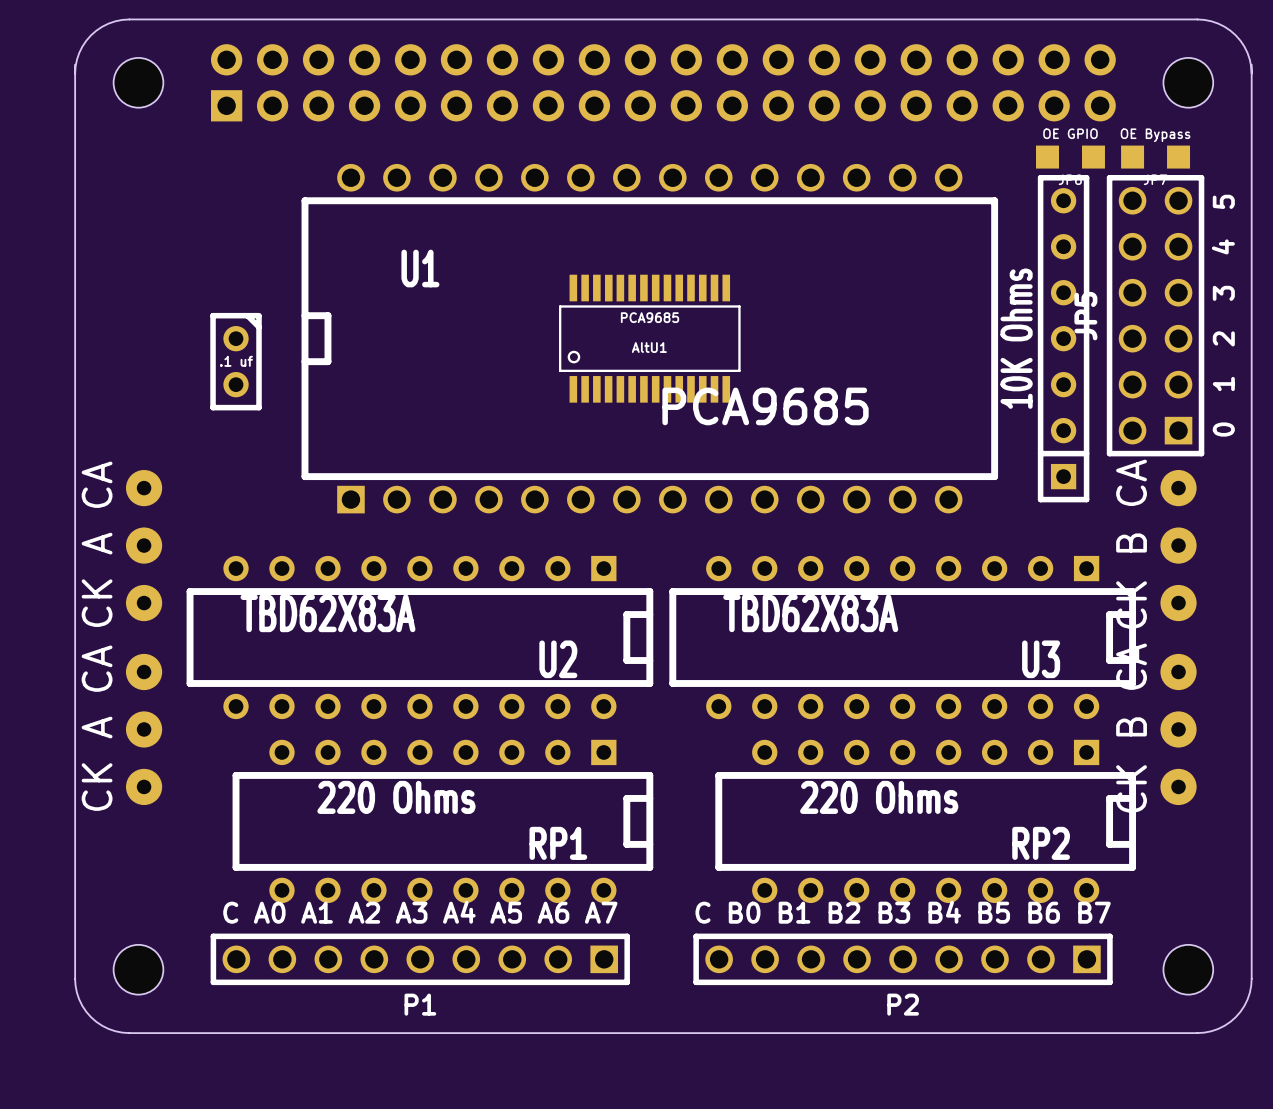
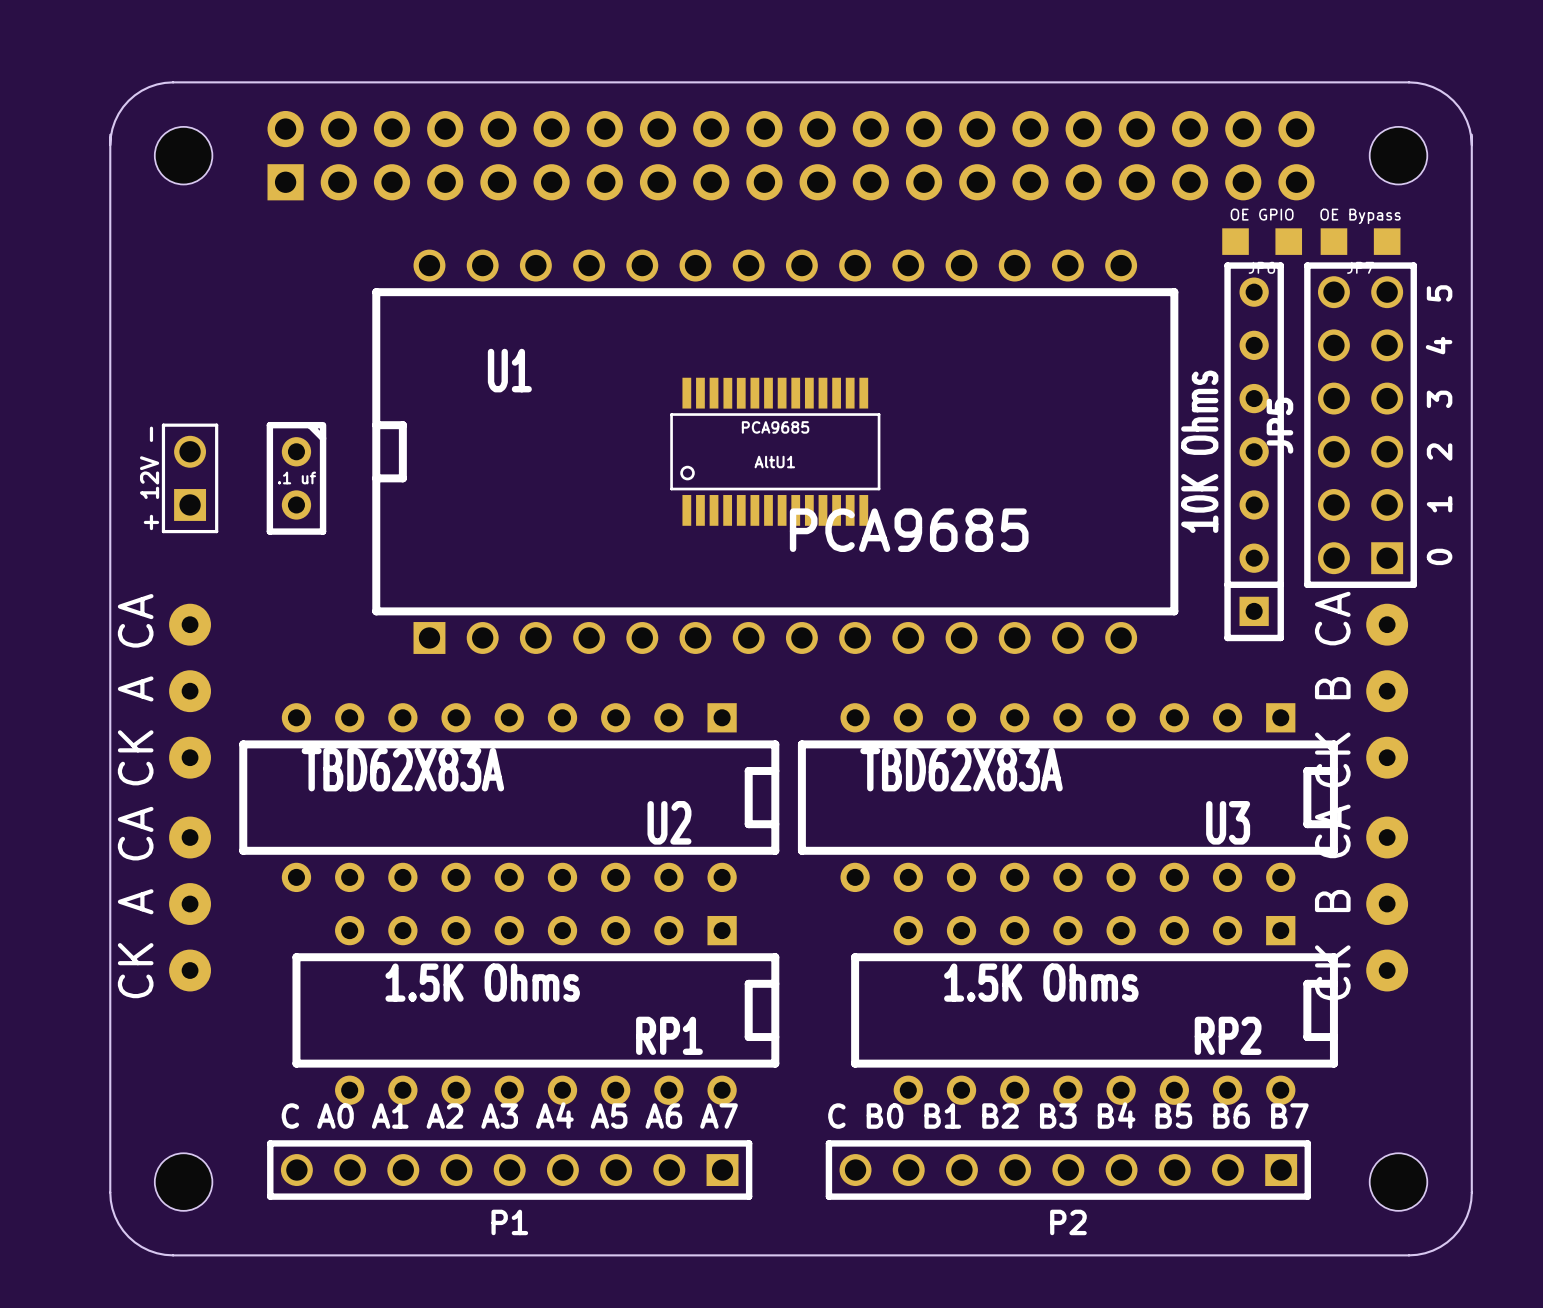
part: none -> + 12V - (190, 478)
RP1 value: 220 Ohms (396, 797) -> 1.5K Ohms (482, 982)
RP2 value: 220 Ohms (879, 797) -> 1.5K Ohms (1041, 982)

